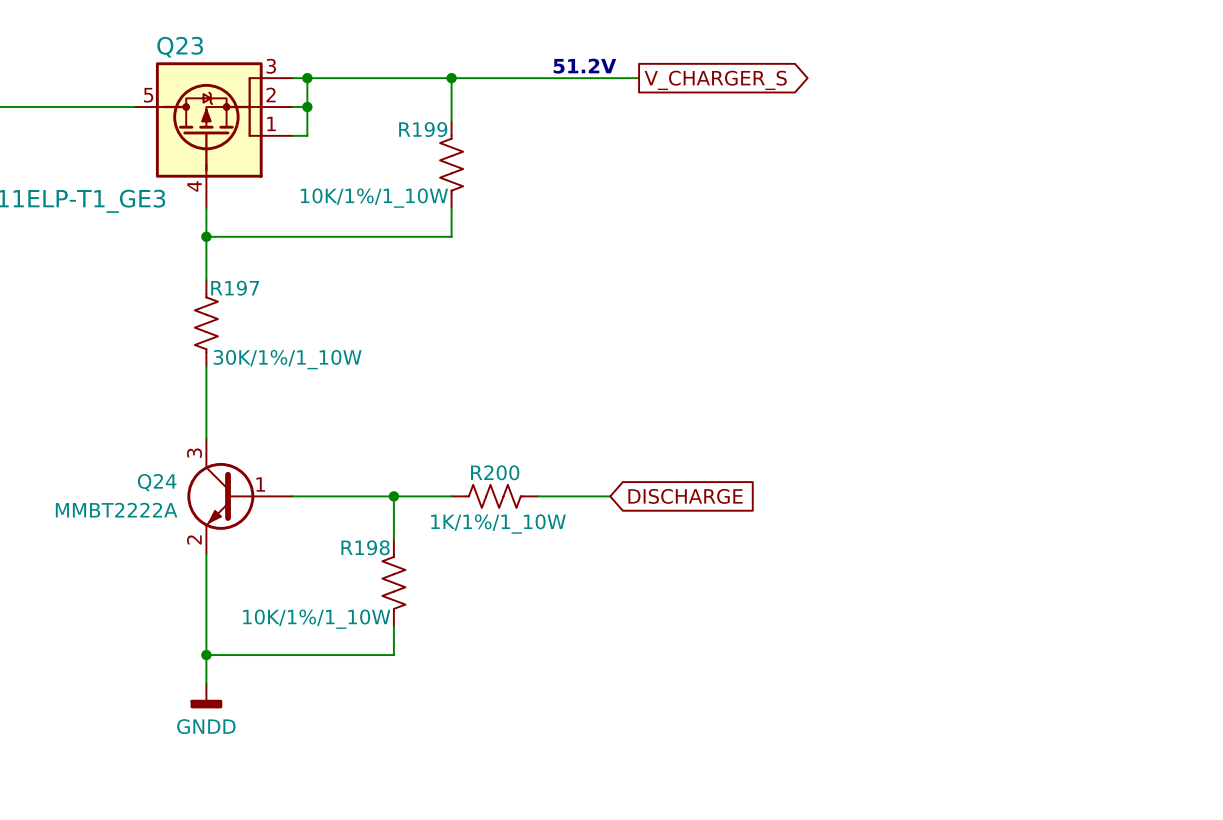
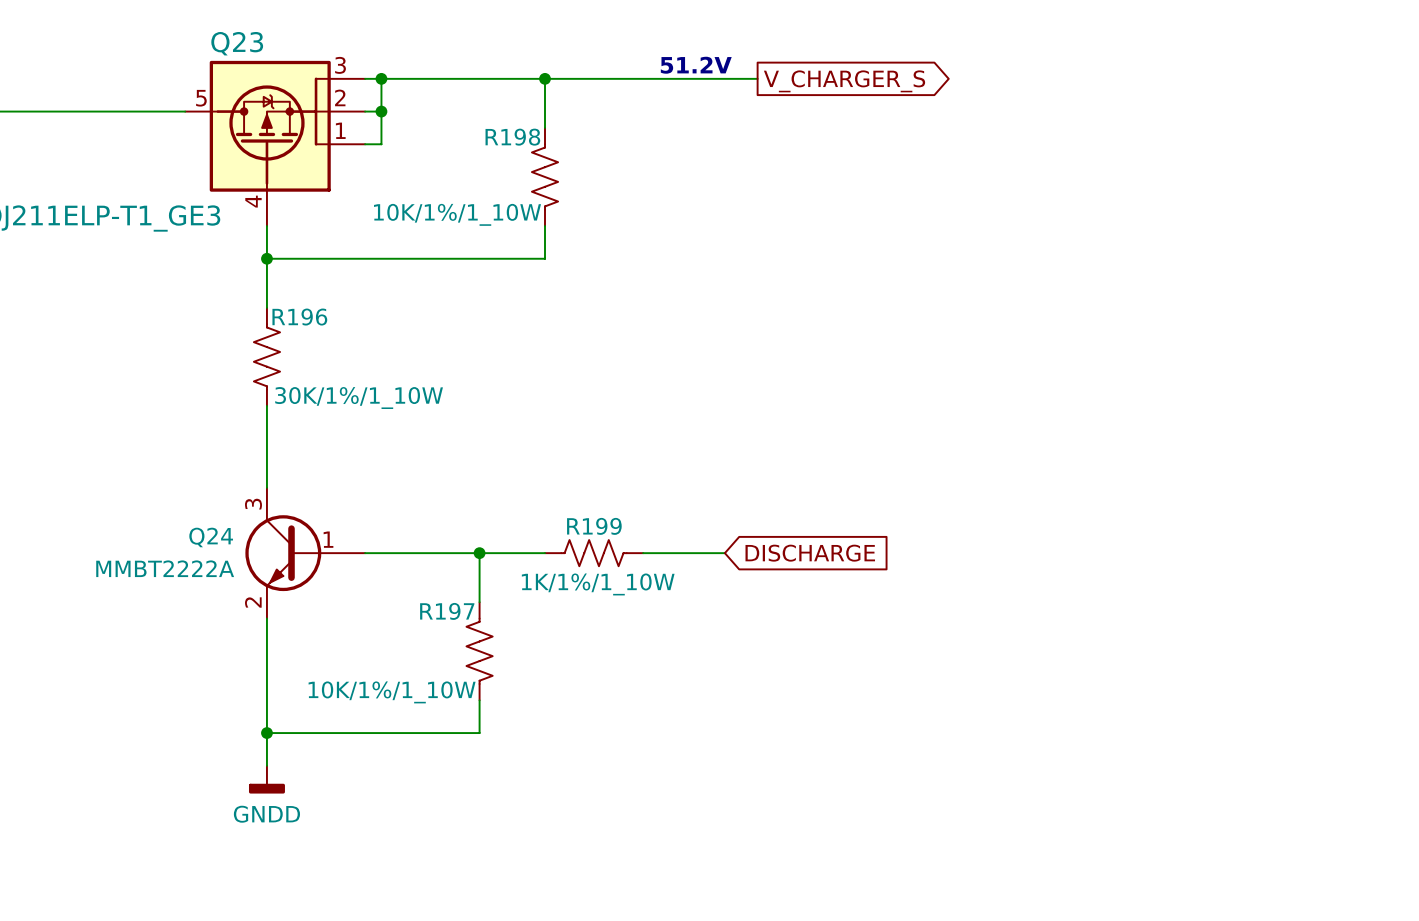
R199 name: R199 (423, 129) -> R198 (512, 137)
R197 name: R197 (235, 288) -> R196 (299, 317)
R200 name: R200 (495, 472) -> R199 (594, 526)
R198 name: R198 (365, 547) -> R197 (447, 611)

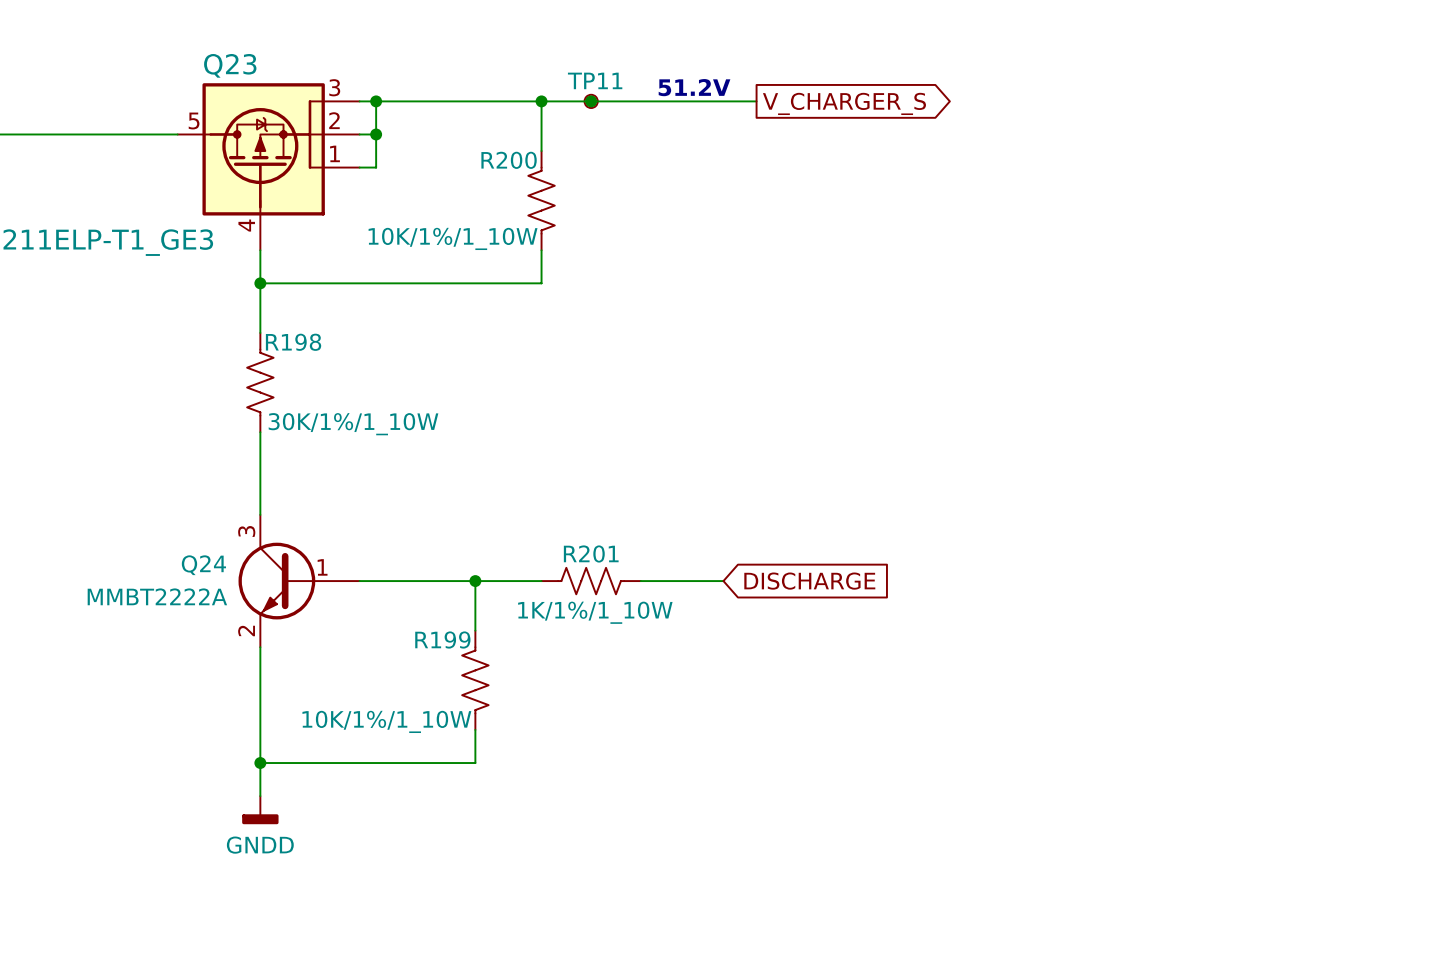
TP11: none -> (591, 101)
junction: none -> (591, 101)
R198 name: R198 (512, 137) -> R200 (509, 160)
R196 name: R196 (299, 317) -> R198 (293, 342)
R199 name: R199 (594, 526) -> R201 (591, 554)
R197 name: R197 (447, 611) -> R199 (442, 640)

